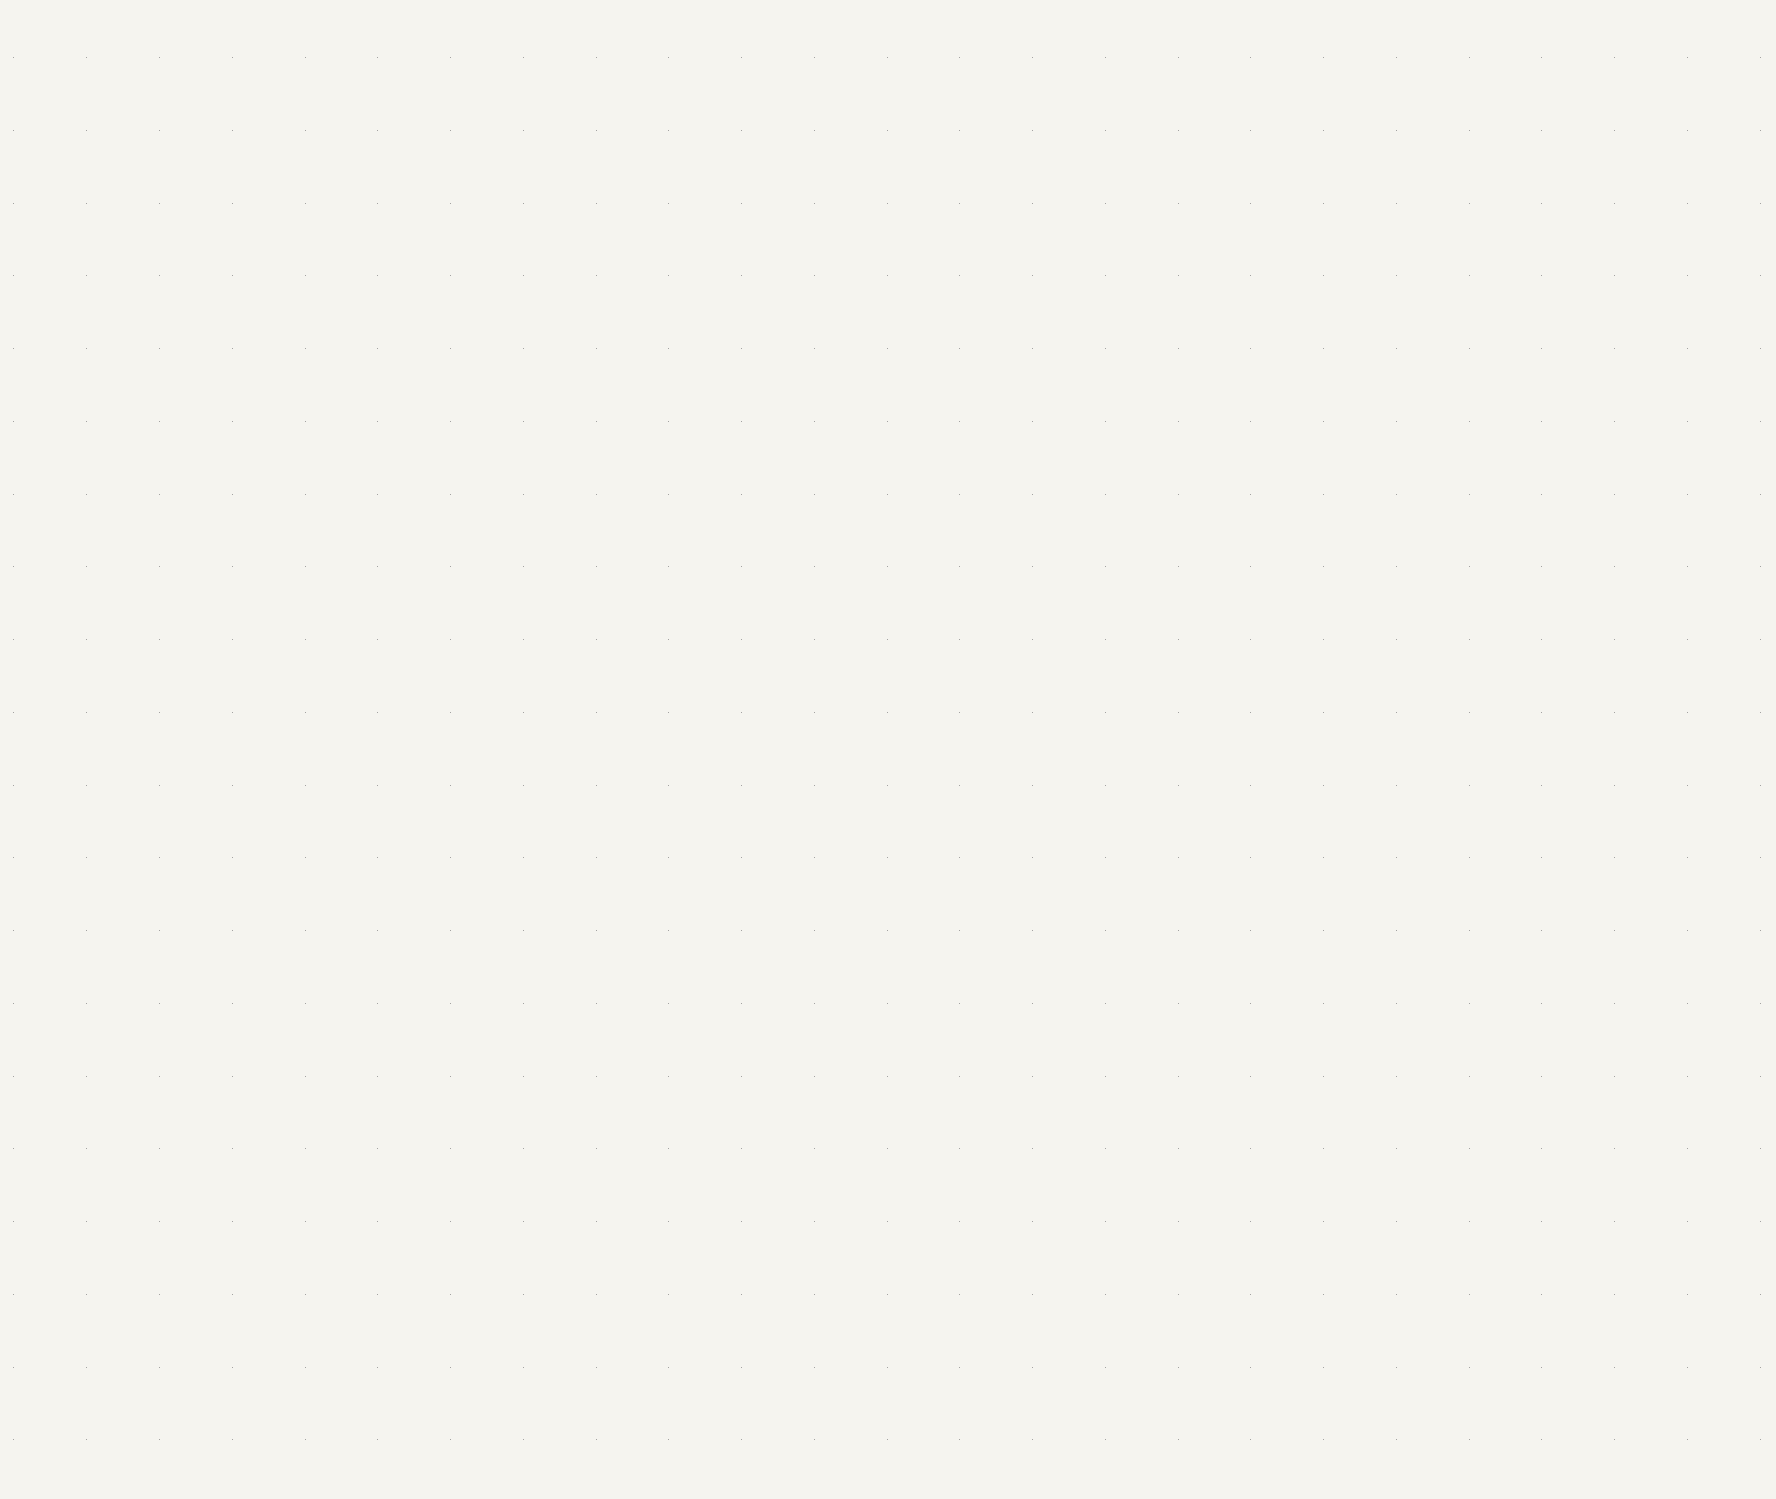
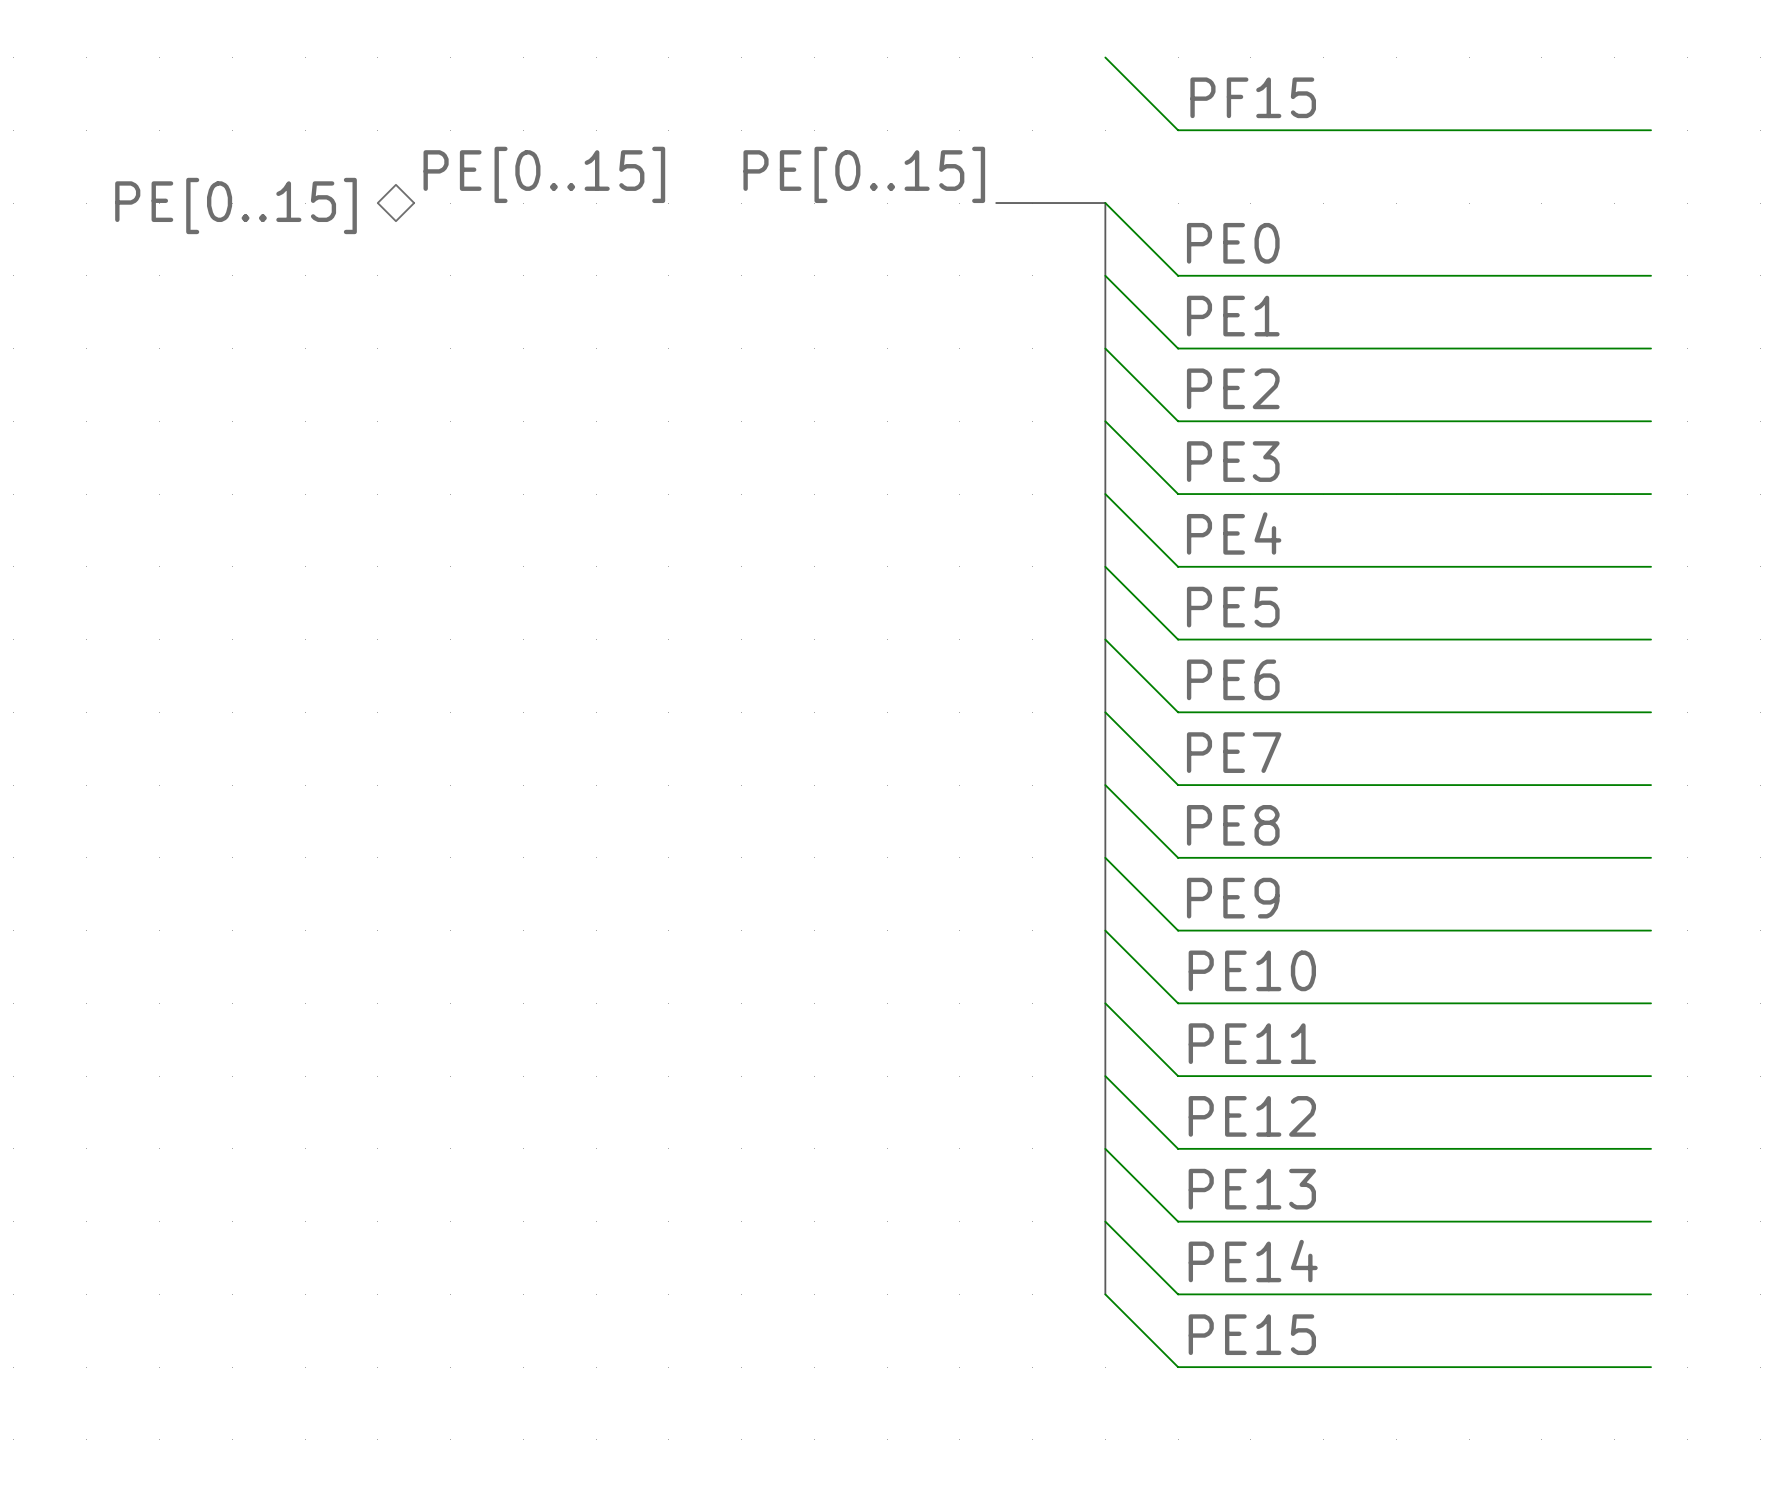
wire: none -> (1105, 57) (1178, 130) (1651, 130)
label: none -> PF15 (1253, 97)
label: none -> PE[0..15] (544, 174)
label: none -> PE[0..15] (864, 174)
bus: none -> (996, 203) (1105, 203) (1105, 1294)
wire: none -> (1105, 203) (1178, 275) (1651, 275)
hierarchical label: none -> PE[0..15] (236, 205)
label: none -> PE0 (1233, 243)
wire: none -> (1105, 275) (1178, 348) (1651, 348)
label: none -> PE1 (1233, 316)
wire: none -> (1105, 348) (1178, 421) (1651, 421)
label: none -> PE2 (1233, 388)
wire: none -> (1105, 421) (1178, 494) (1651, 494)
label: none -> PE3 (1233, 461)
wire: none -> (1105, 494) (1178, 566) (1651, 566)
label: none -> PE4 (1234, 533)
wire: none -> (1105, 566) (1178, 639) (1651, 639)
label: none -> PE5 (1233, 607)
wire: none -> (1105, 639) (1178, 712) (1651, 712)
label: none -> PE6 (1233, 679)
wire: none -> (1105, 712) (1178, 785) (1651, 785)
label: none -> PE7 (1234, 752)
wire: none -> (1105, 785) (1178, 857) (1651, 857)
label: none -> PE8 (1233, 825)
wire: none -> (1105, 857) (1178, 930) (1651, 930)
label: none -> PE9 (1233, 898)
wire: none -> (1105, 930) (1178, 1003) (1651, 1003)
label: none -> PE10 (1252, 970)
wire: none -> (1105, 1003) (1178, 1076) (1651, 1076)
label: none -> PE11 (1252, 1043)
wire: none -> (1105, 1076) (1178, 1148) (1651, 1148)
label: none -> PE12 (1252, 1116)
wire: none -> (1105, 1148) (1178, 1221) (1651, 1221)
label: none -> PE13 (1252, 1189)
wire: none -> (1105, 1221) (1178, 1294) (1651, 1294)
label: none -> PE14 (1253, 1261)
wire: none -> (1105, 1294) (1178, 1367) (1651, 1367)
label: none -> PE15 (1252, 1334)

